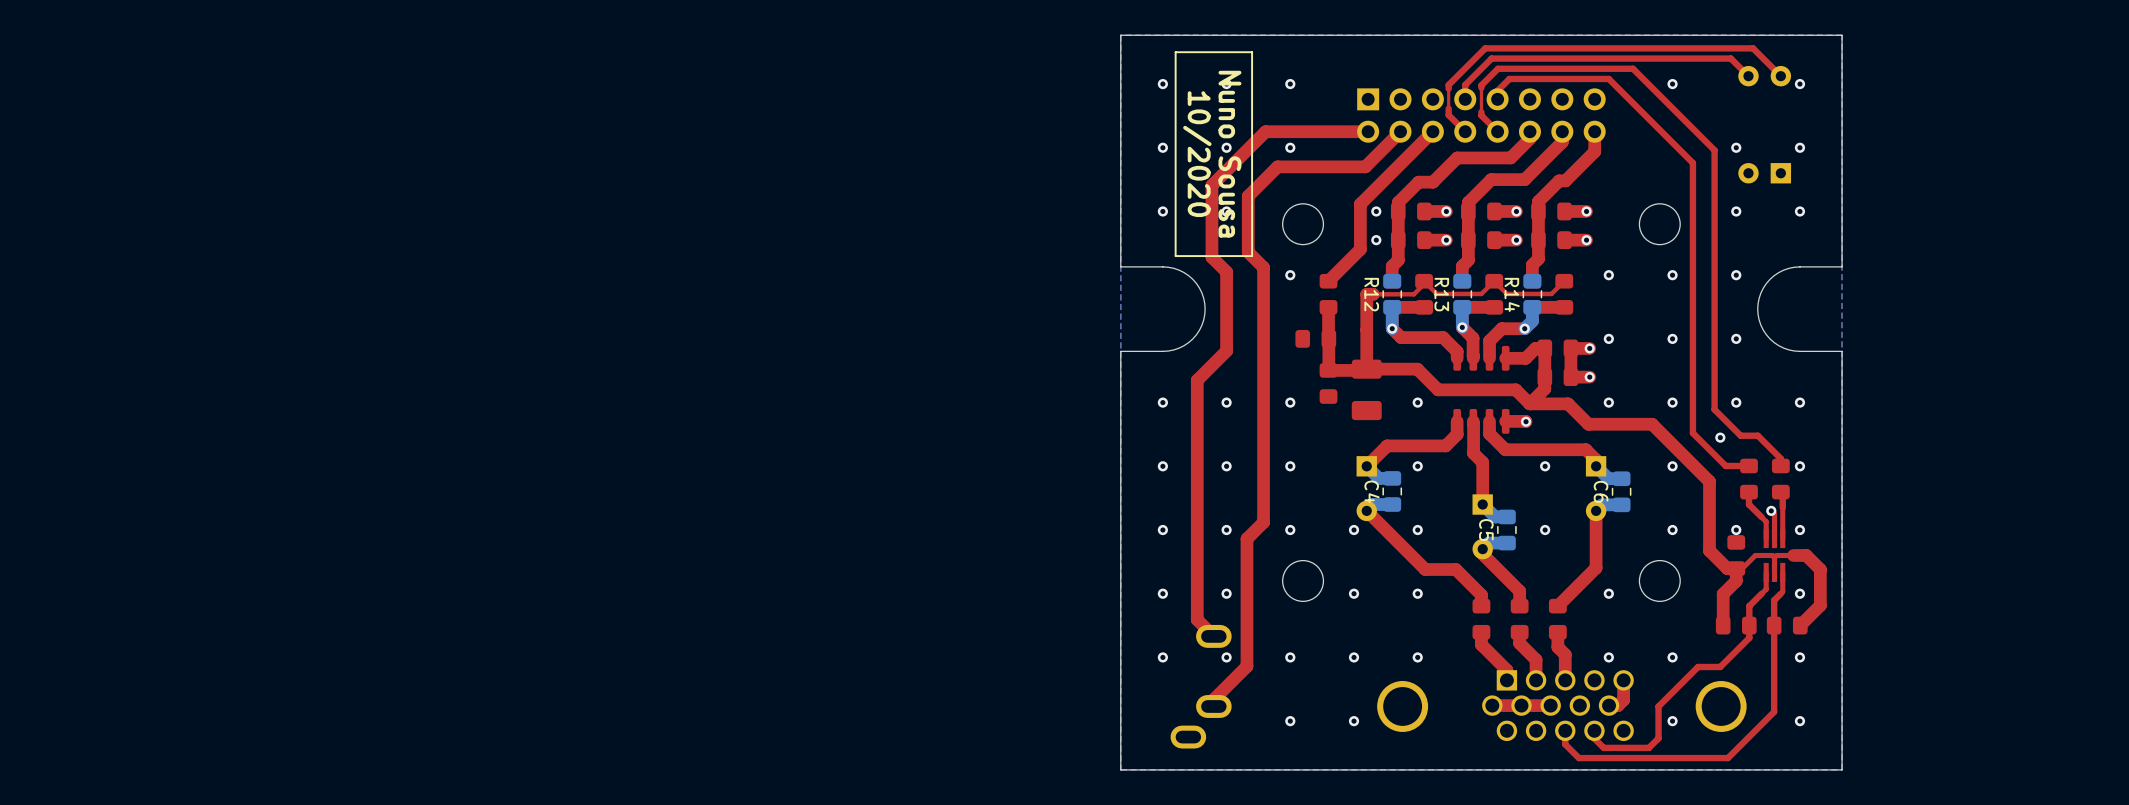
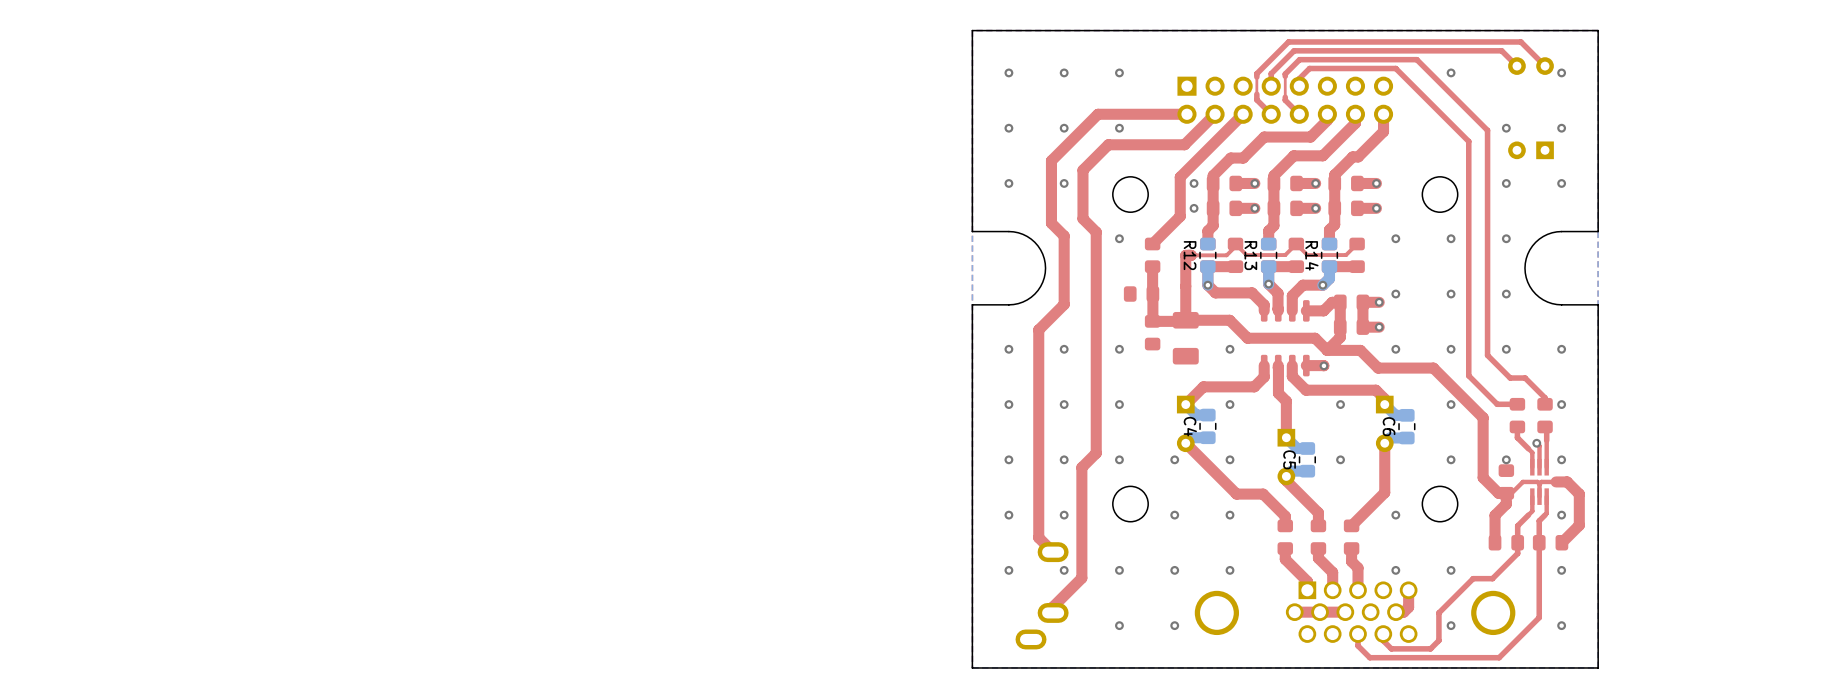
line: (1252, 52) (1175, 52) (1175, 256) (1252, 256) (1252, 52) -> none
text: 10/2020 (1197, 154) -> none
text: Nuno Sousa (1229, 154) -> none
via: (1720, 437) -> none

